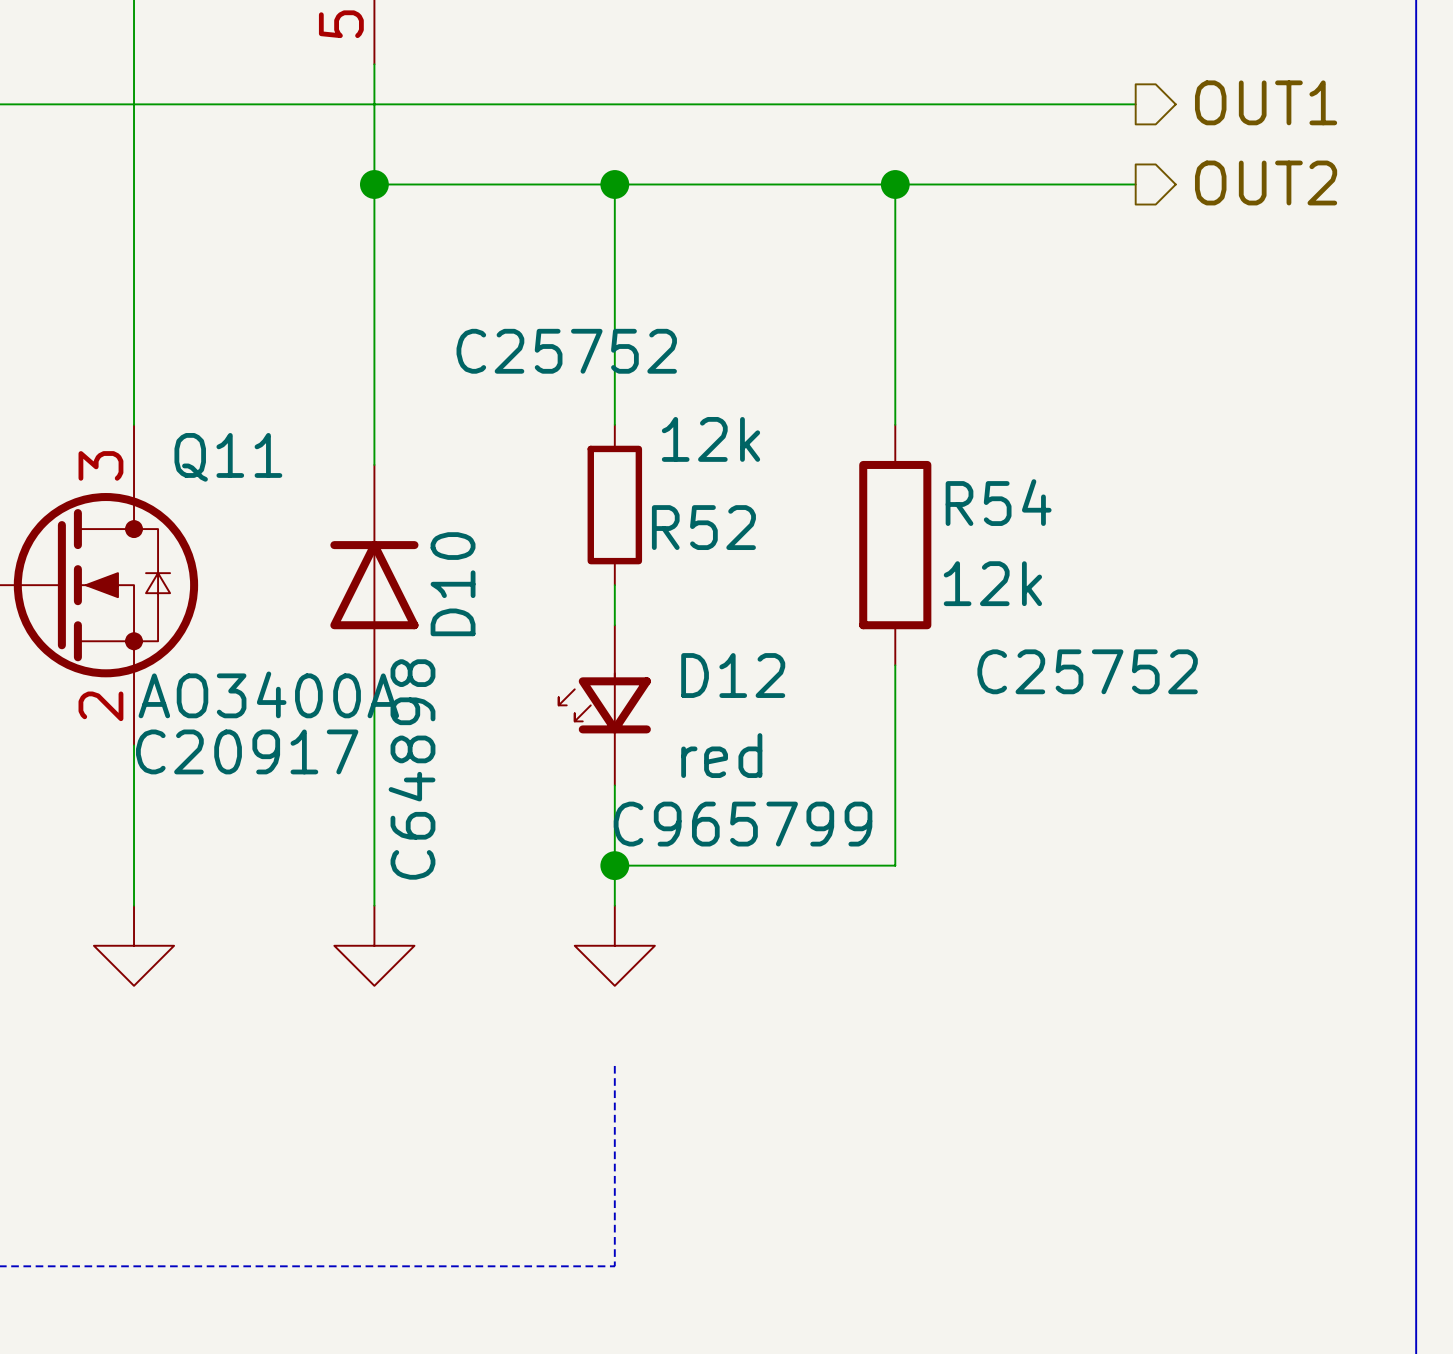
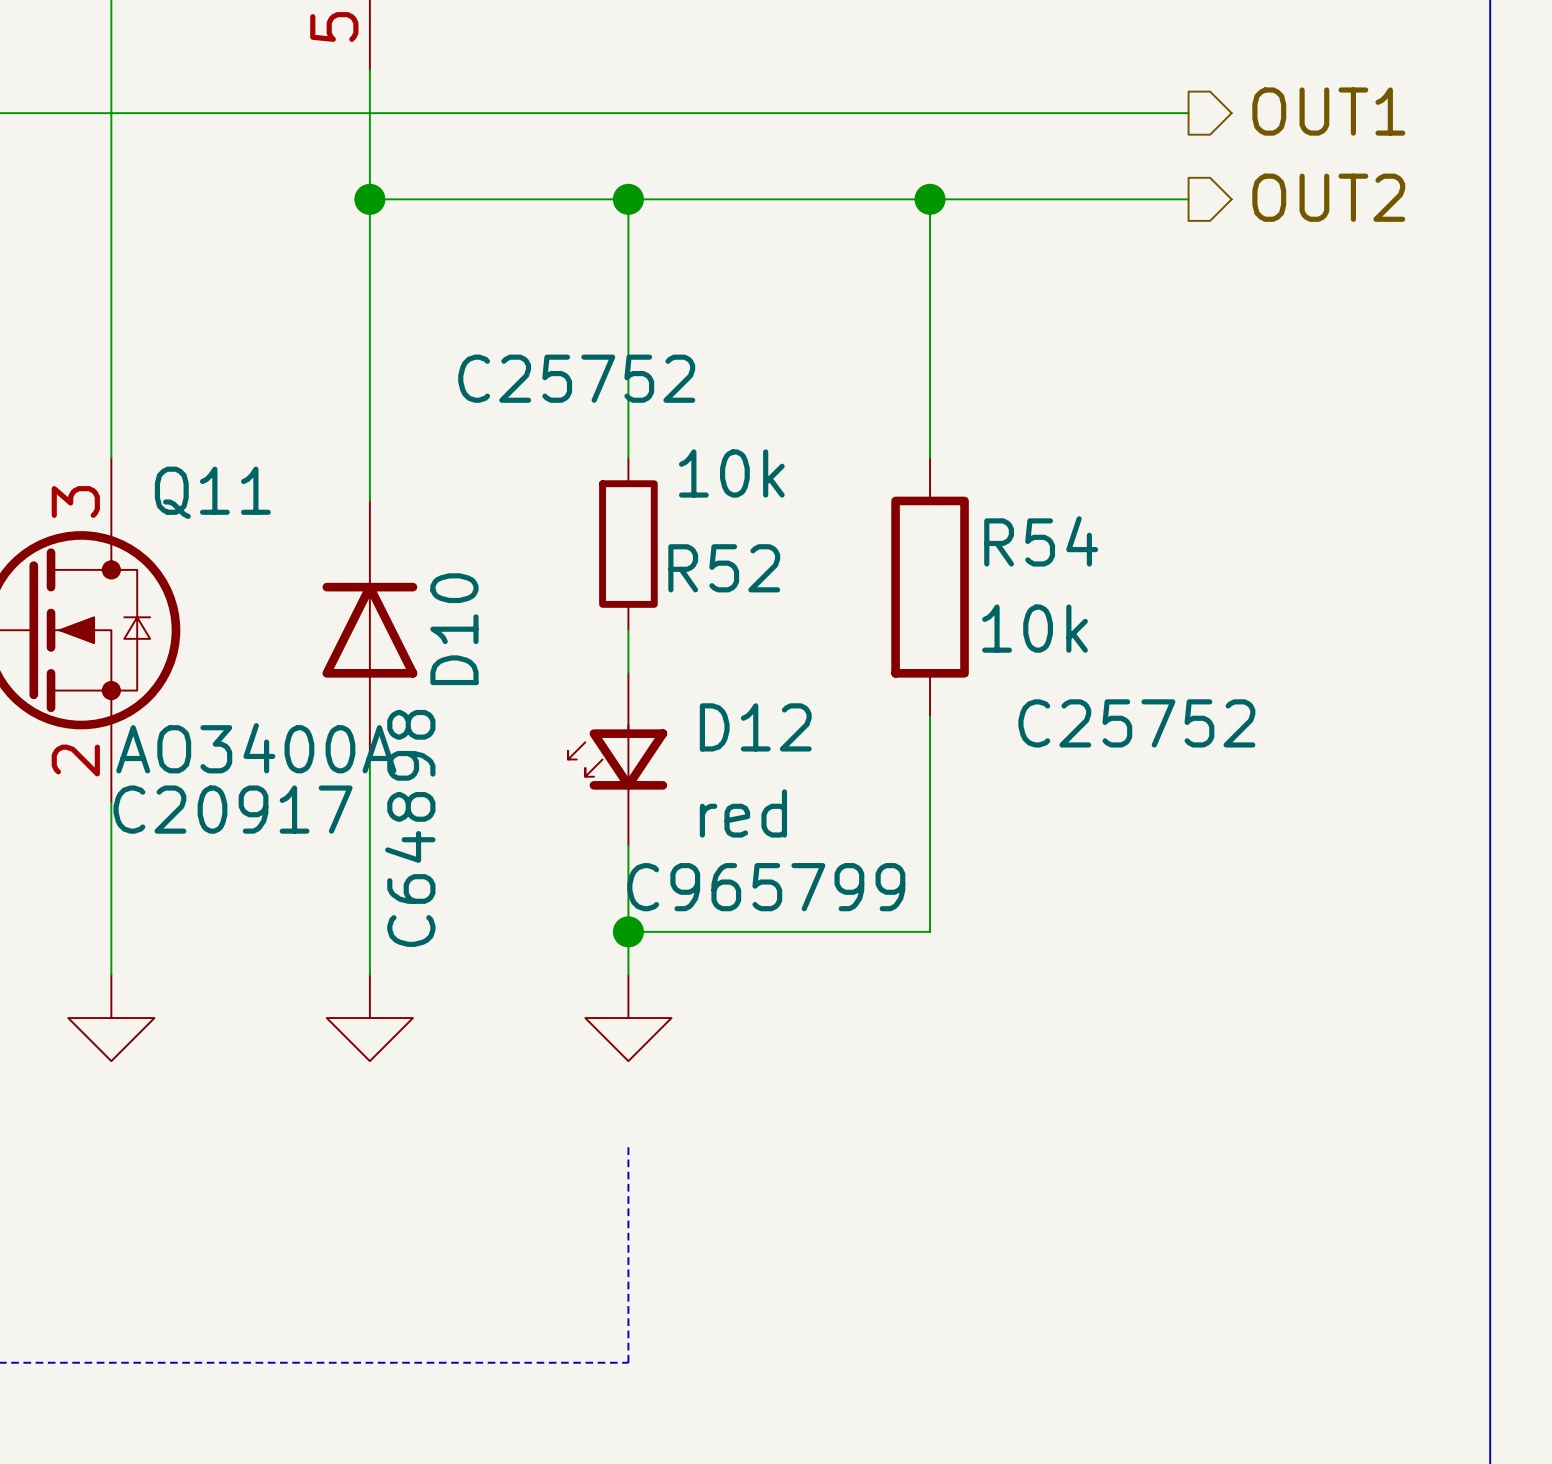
R52 value: 12k (710, 439) -> 10k (731, 473)
R54 value: 12k (992, 583) -> 10k (1035, 628)

